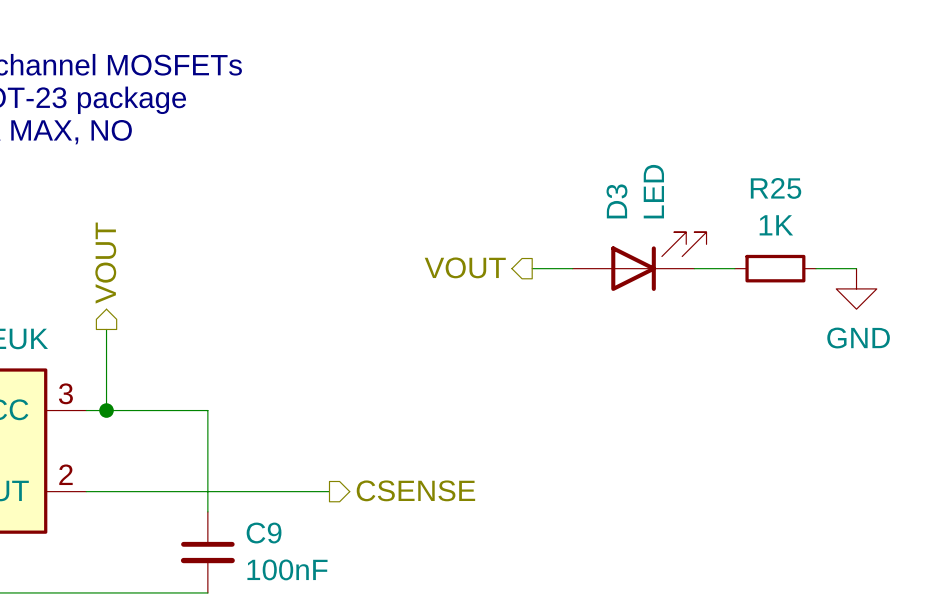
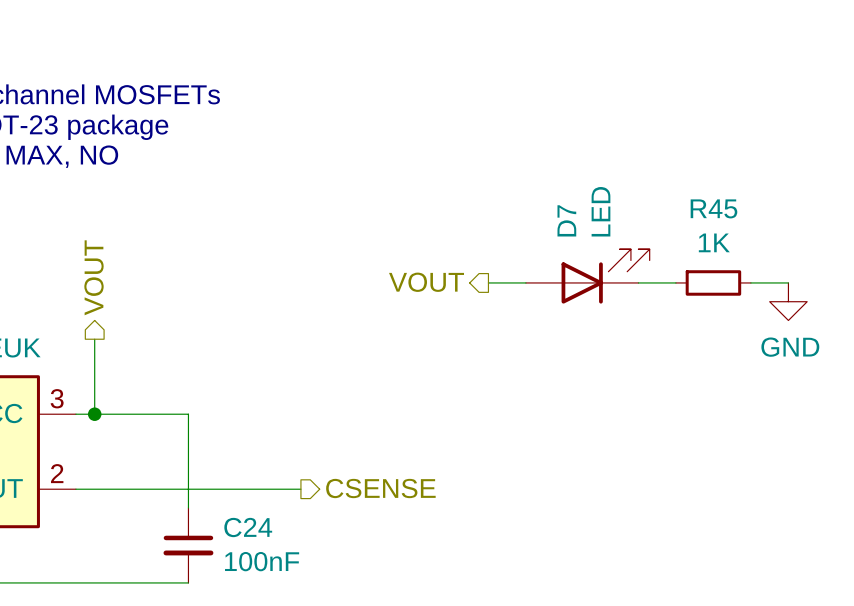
R25 name: R25 (776, 188) -> R45 (713, 208)
D3 name: D3 (616, 201) -> D7 (566, 220)
C9 name: C9 (264, 533) -> C24 (248, 527)

